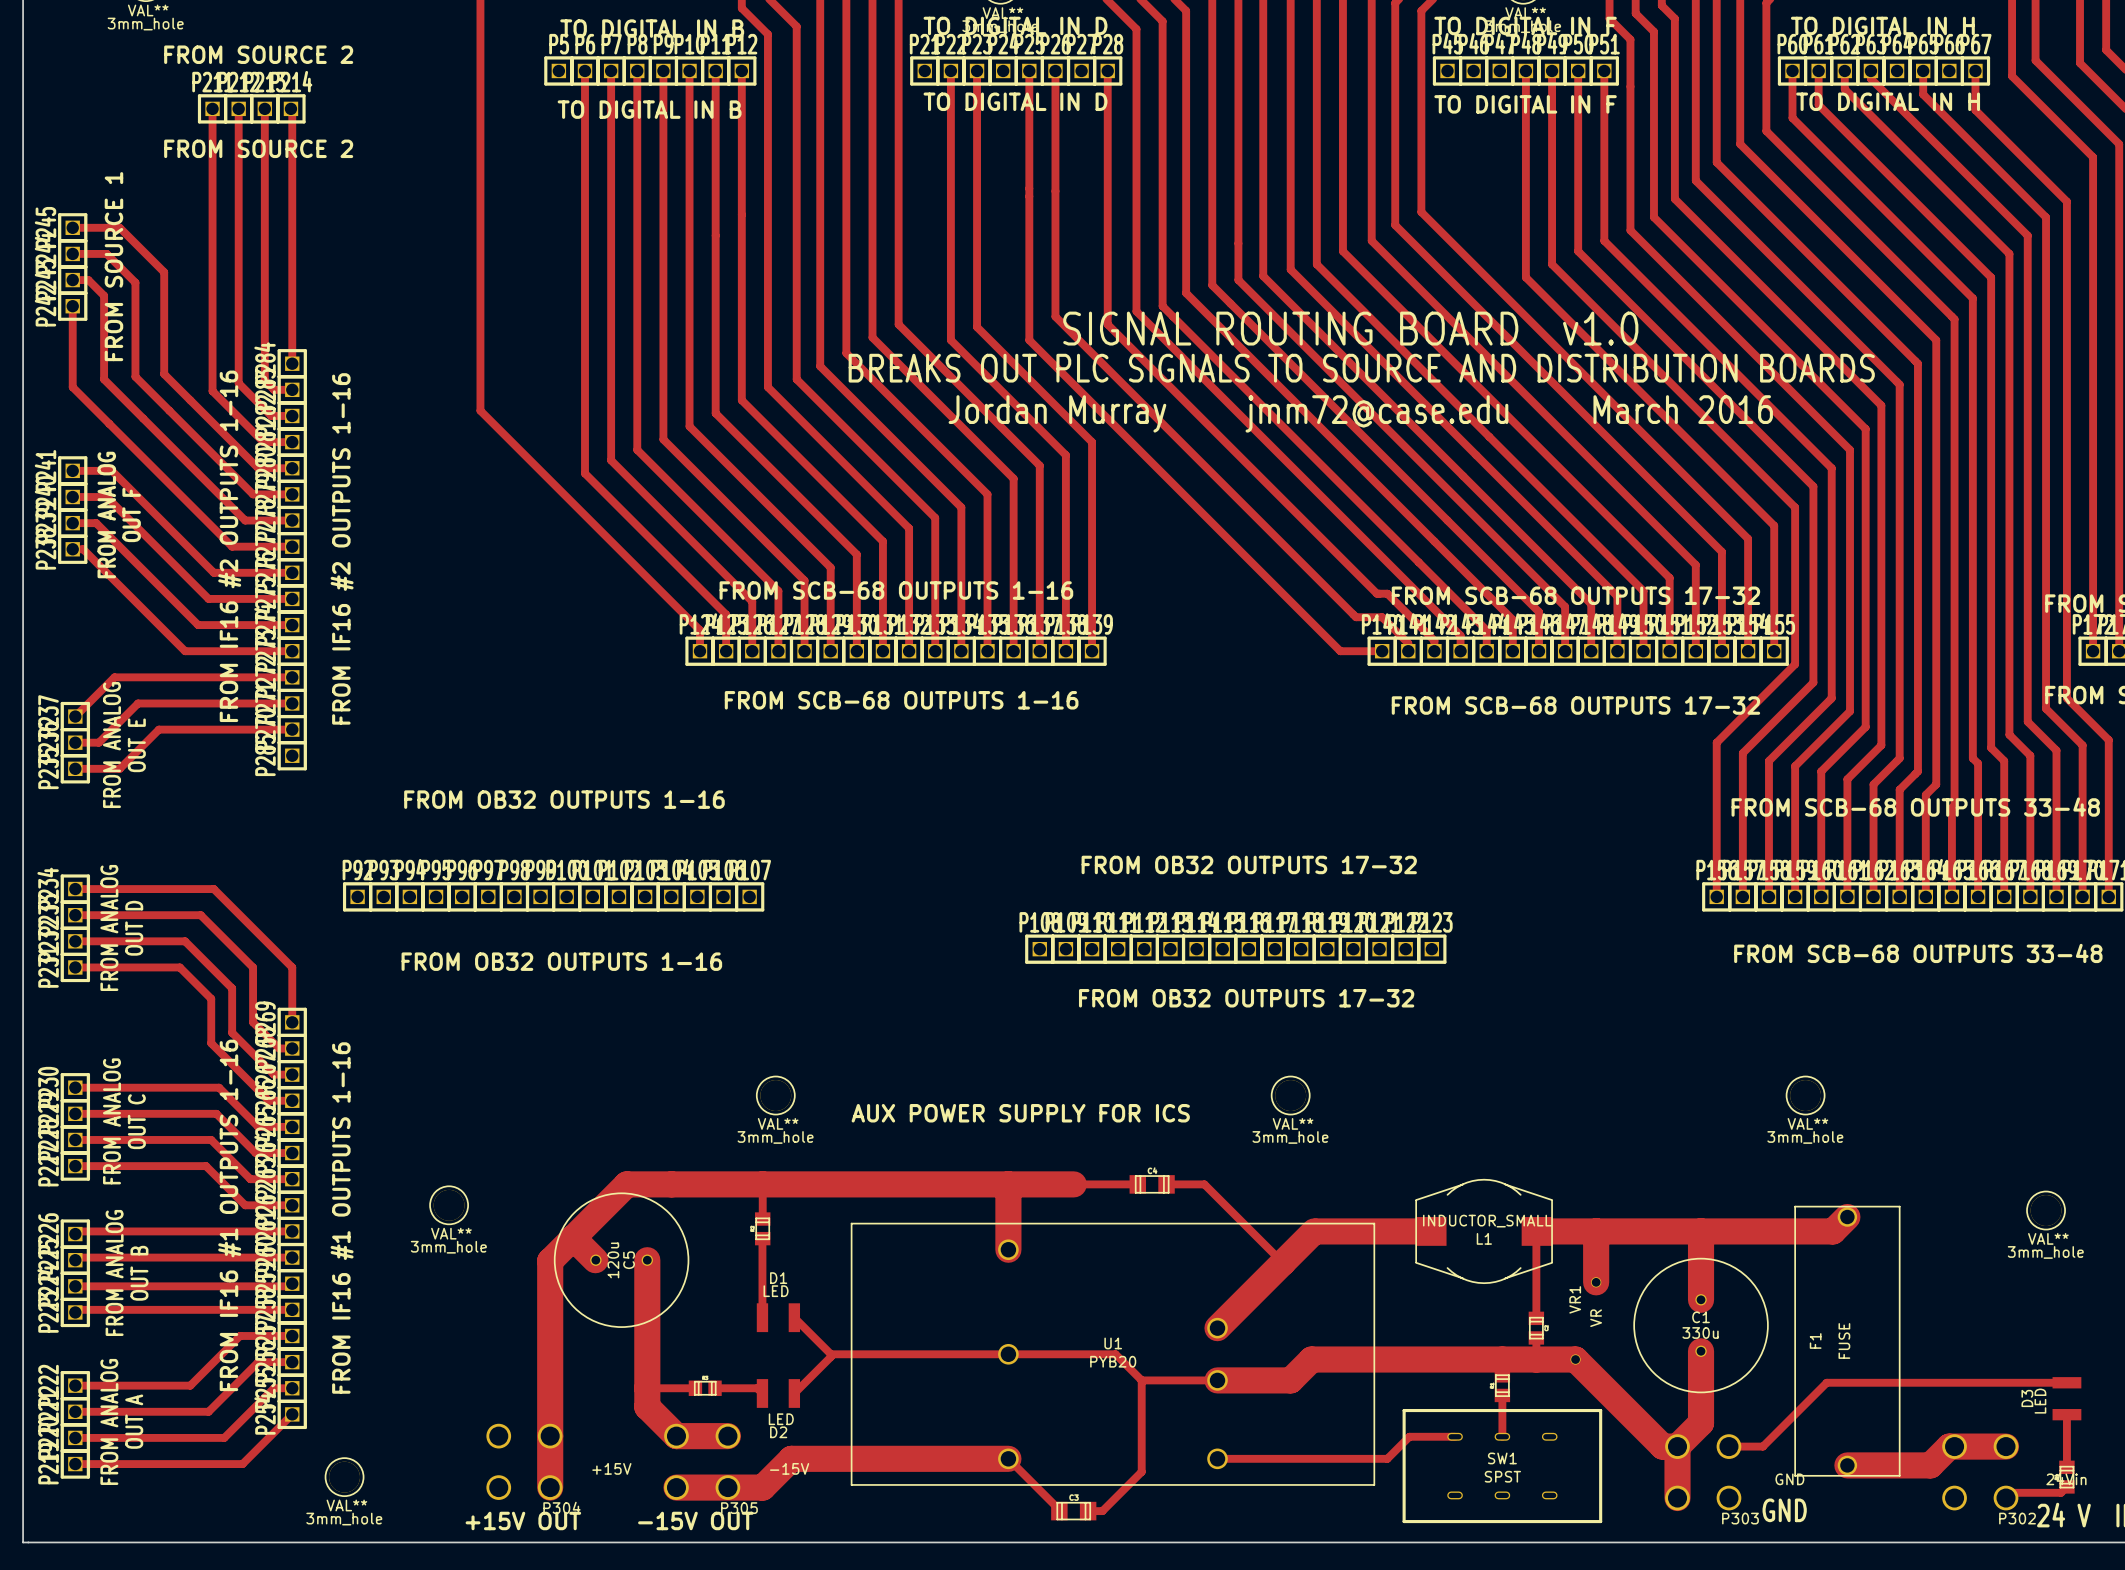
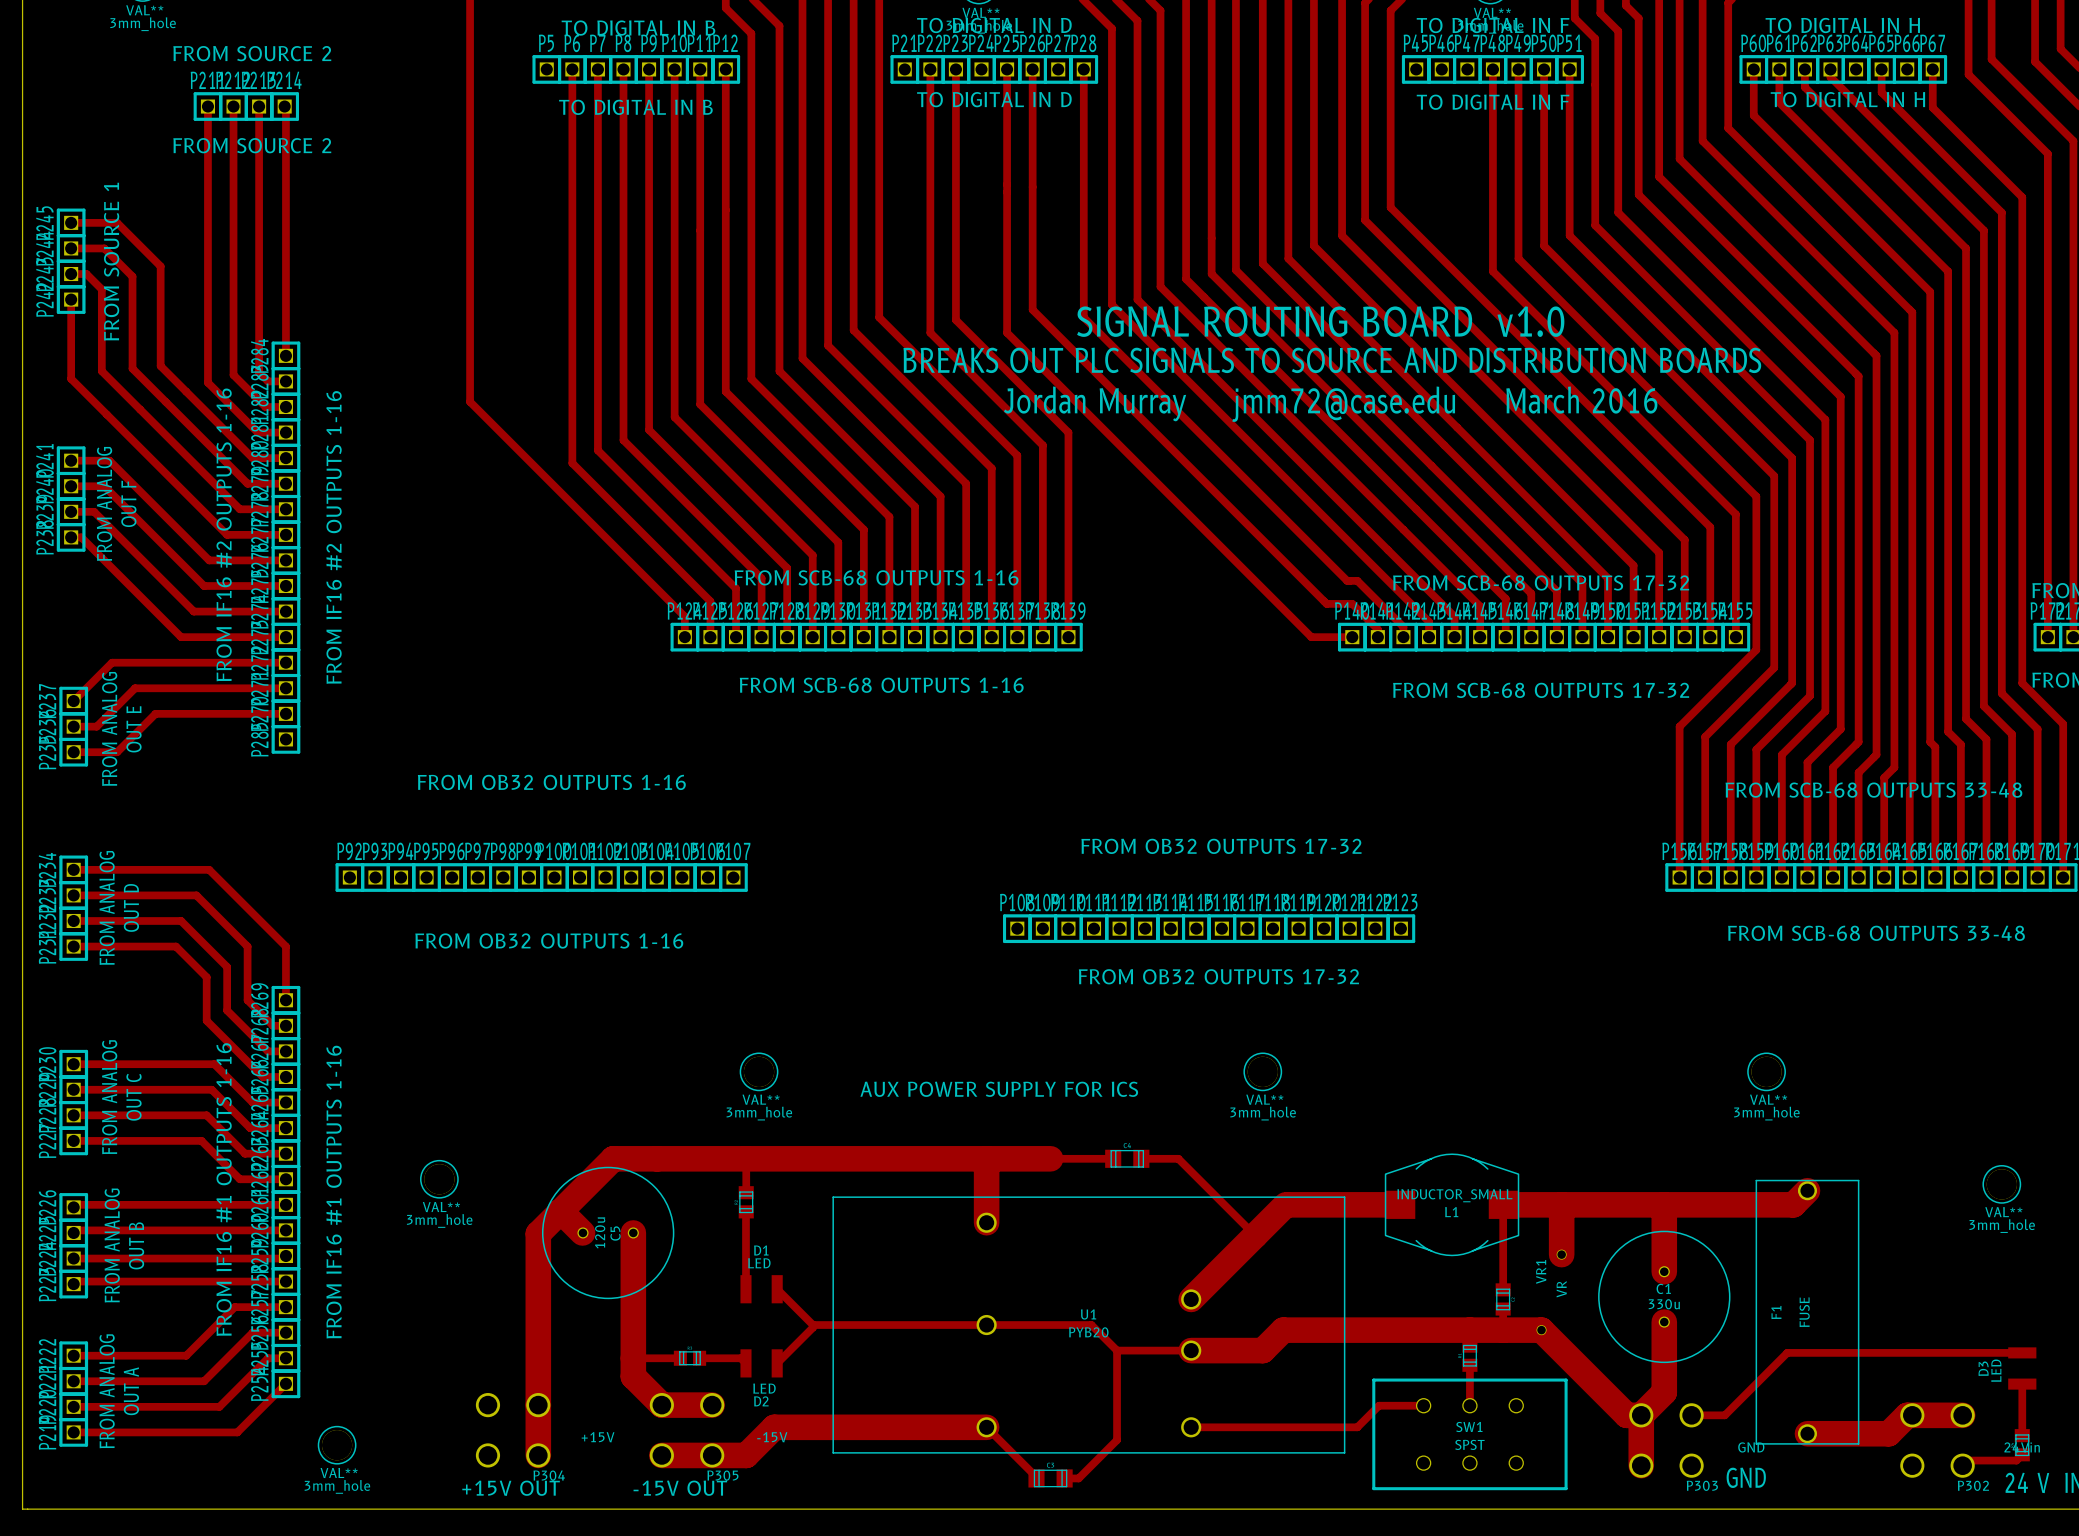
SW1 footprint: [1402, 1408, 1603, 1524] -> [1372, 1378, 1568, 1491]

